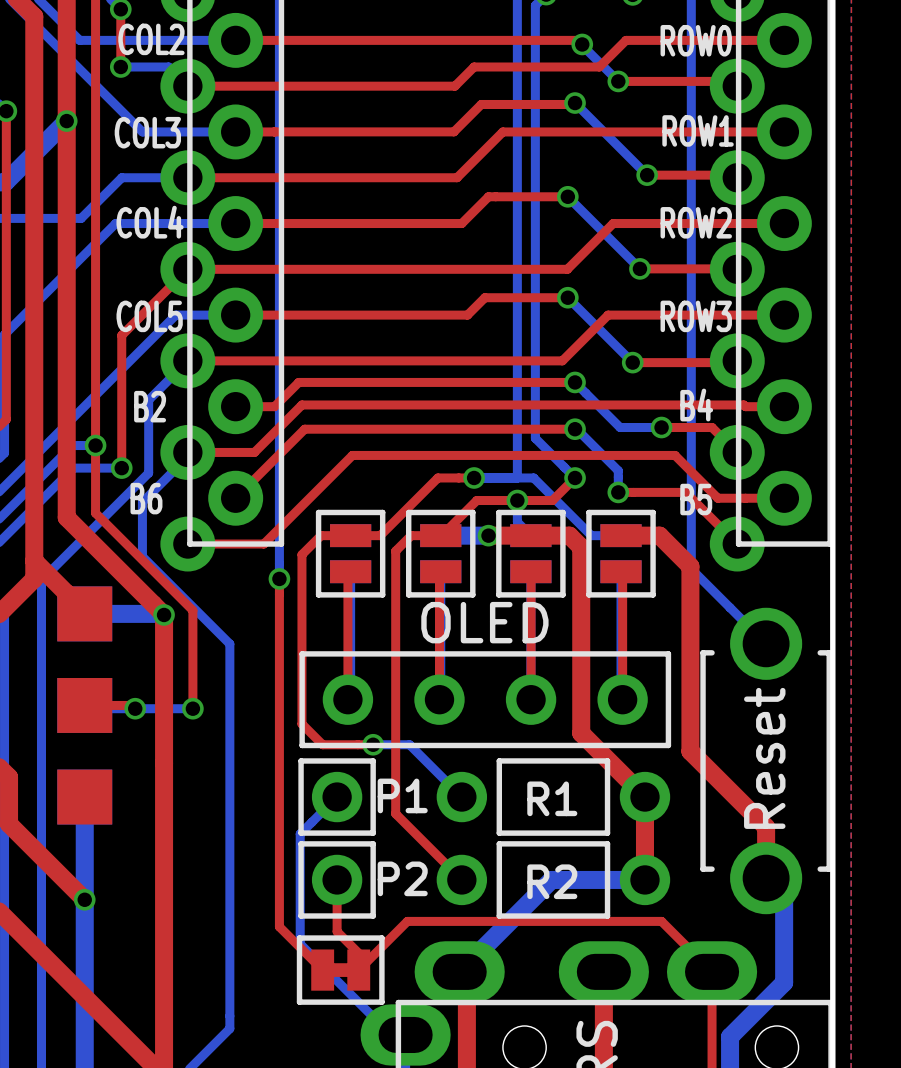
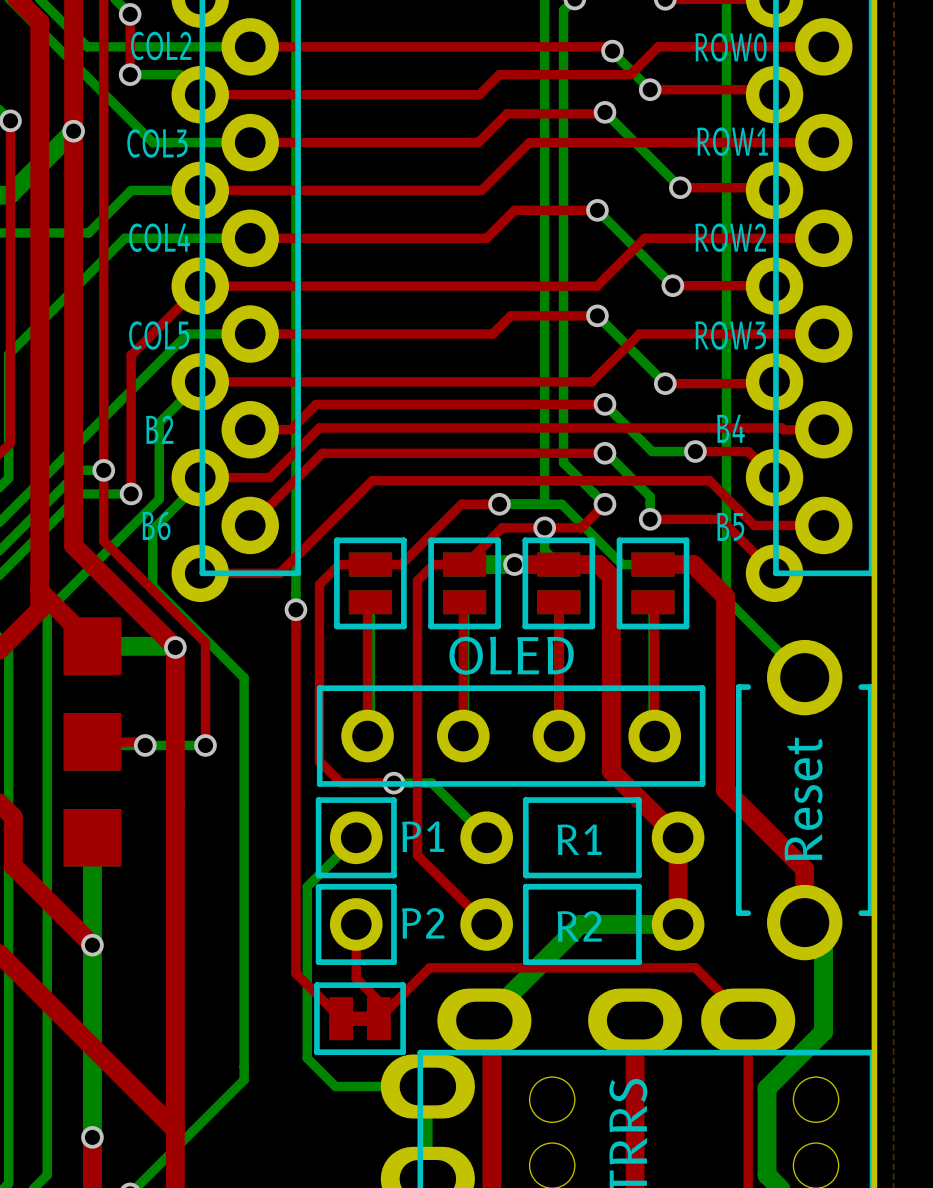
bottom track: (300, 833) (300, 944) (391, 1034) -> (317, 876) (307, 886) (307, 1058) (335, 1086) (412, 1086)

